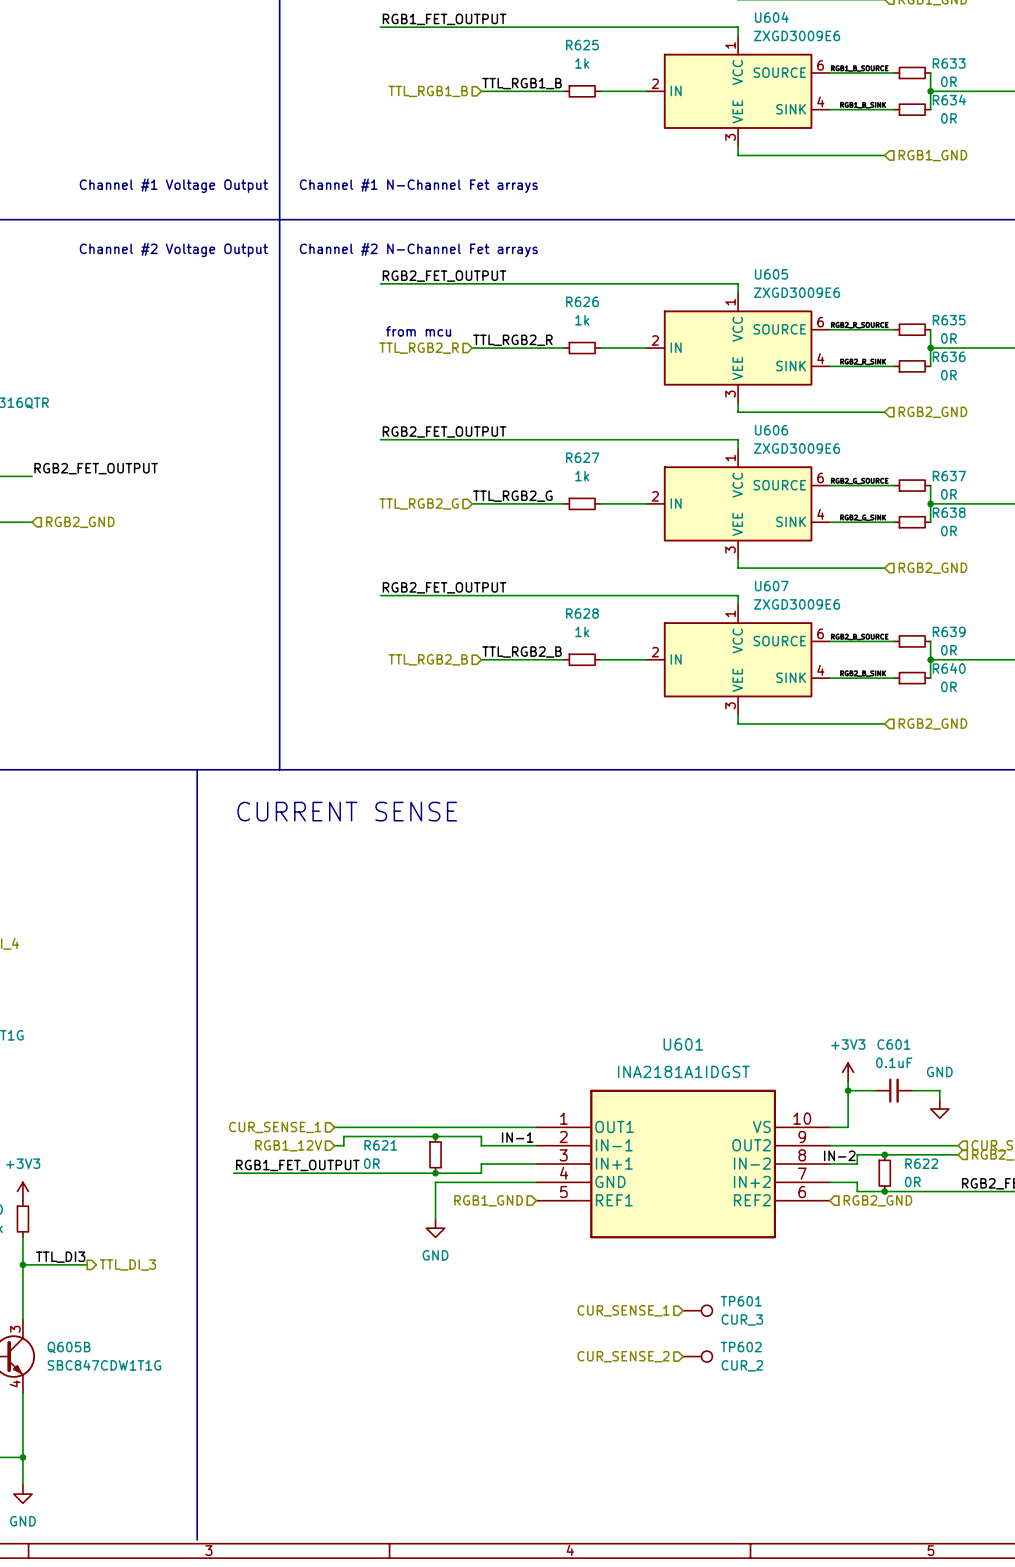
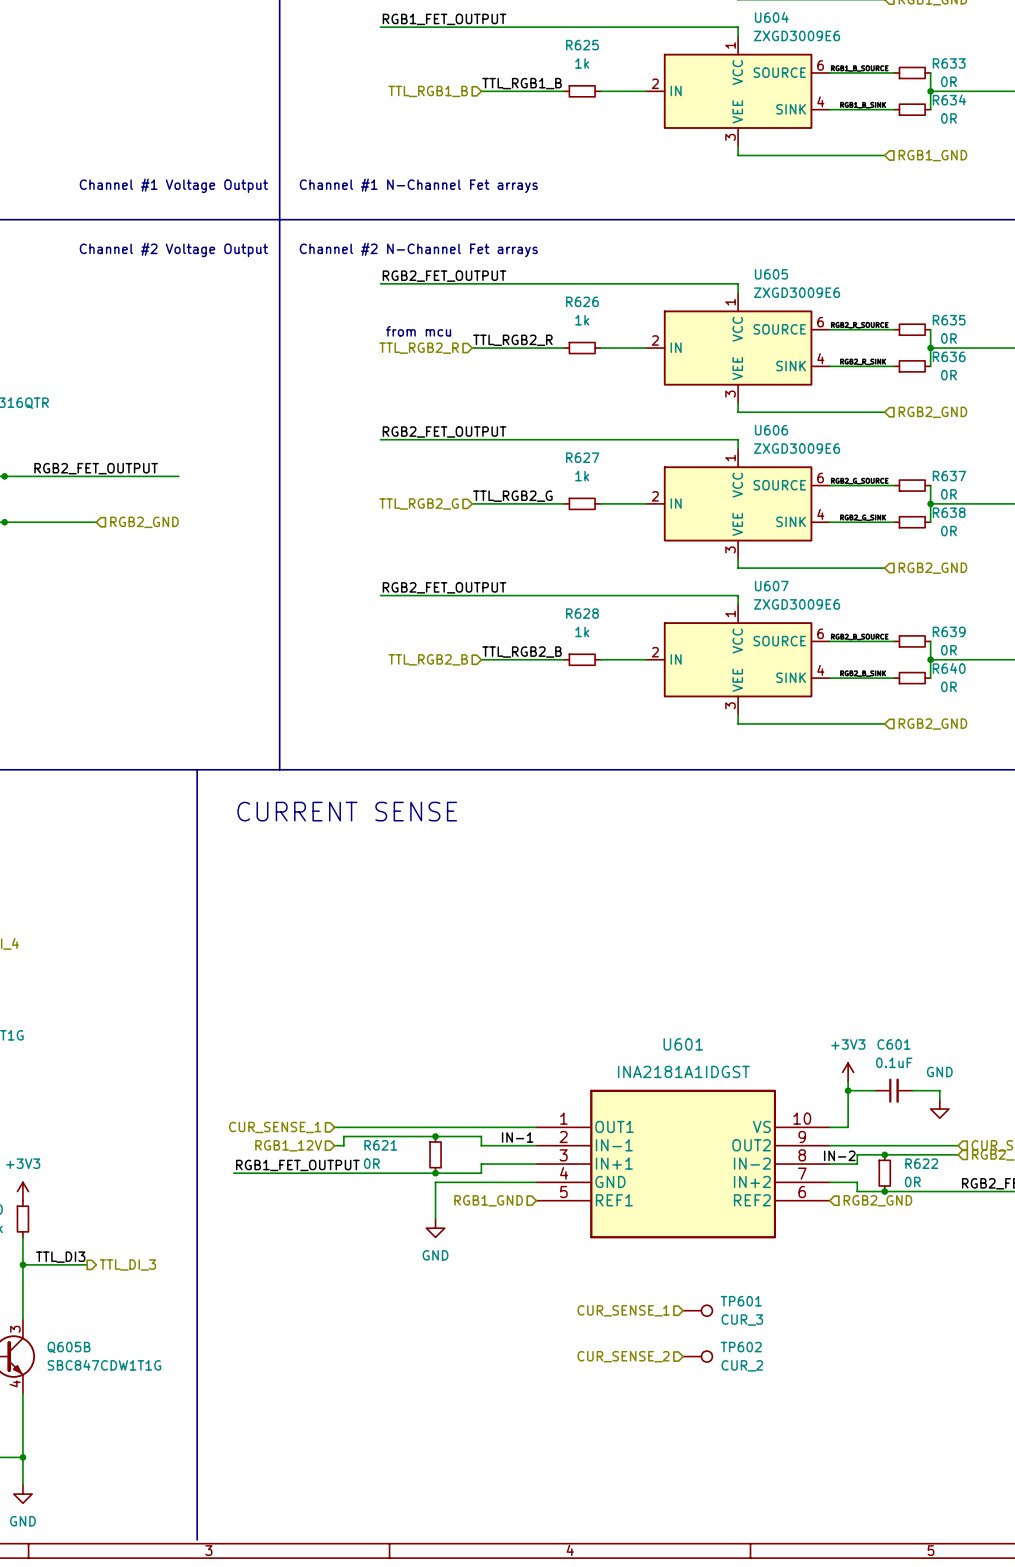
junction: none -> (4, 476)
wire: none -> (32, 476) (178, 476)
junction: none -> (4, 522)
wire: none -> (32, 522) (96, 522)
hierarchical label position: RGB2_GND (80, 522) -> RGB2_GND (144, 522)

